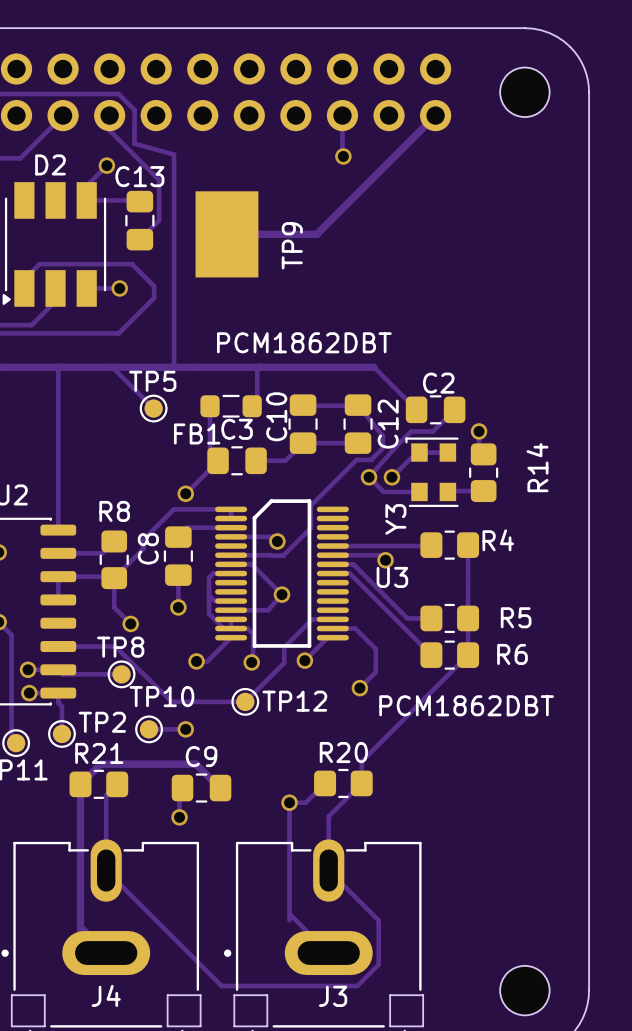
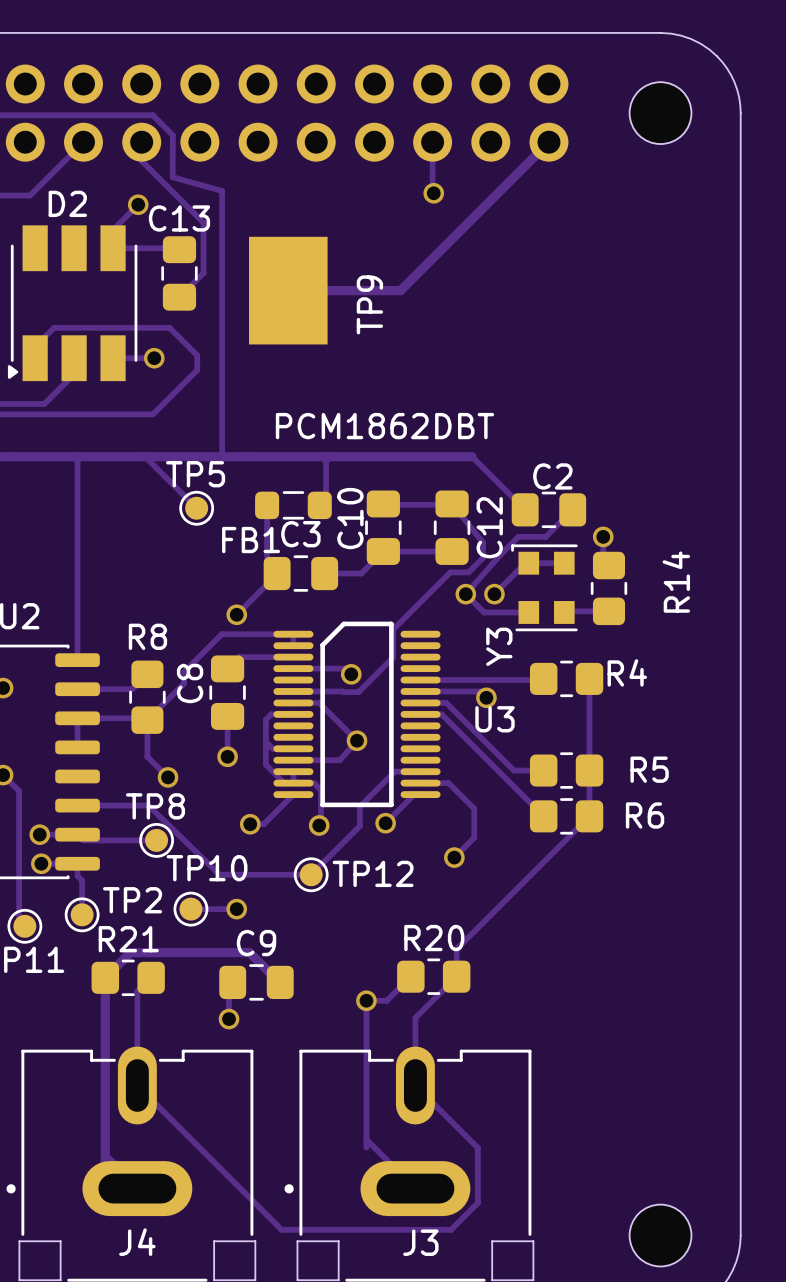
U3 text: PCM1862DBT (466, 705) -> none

